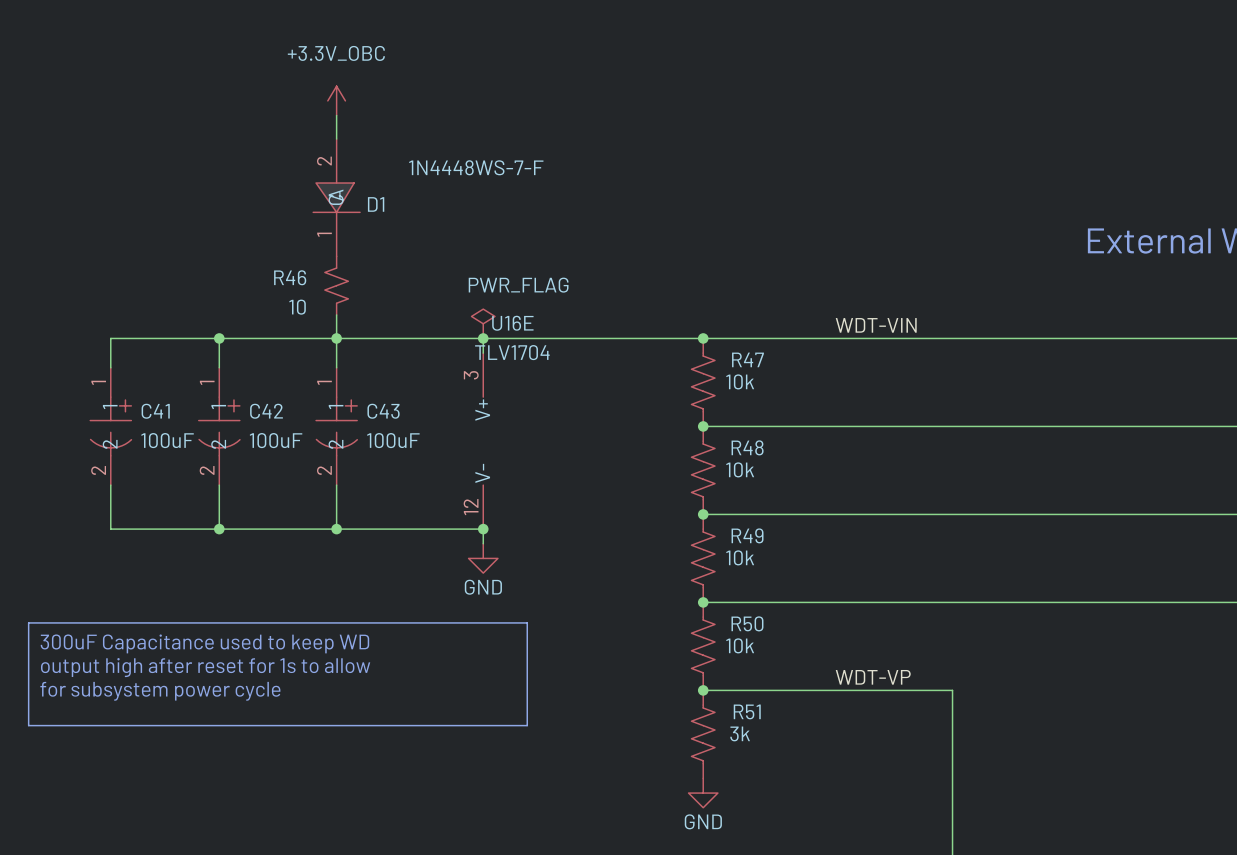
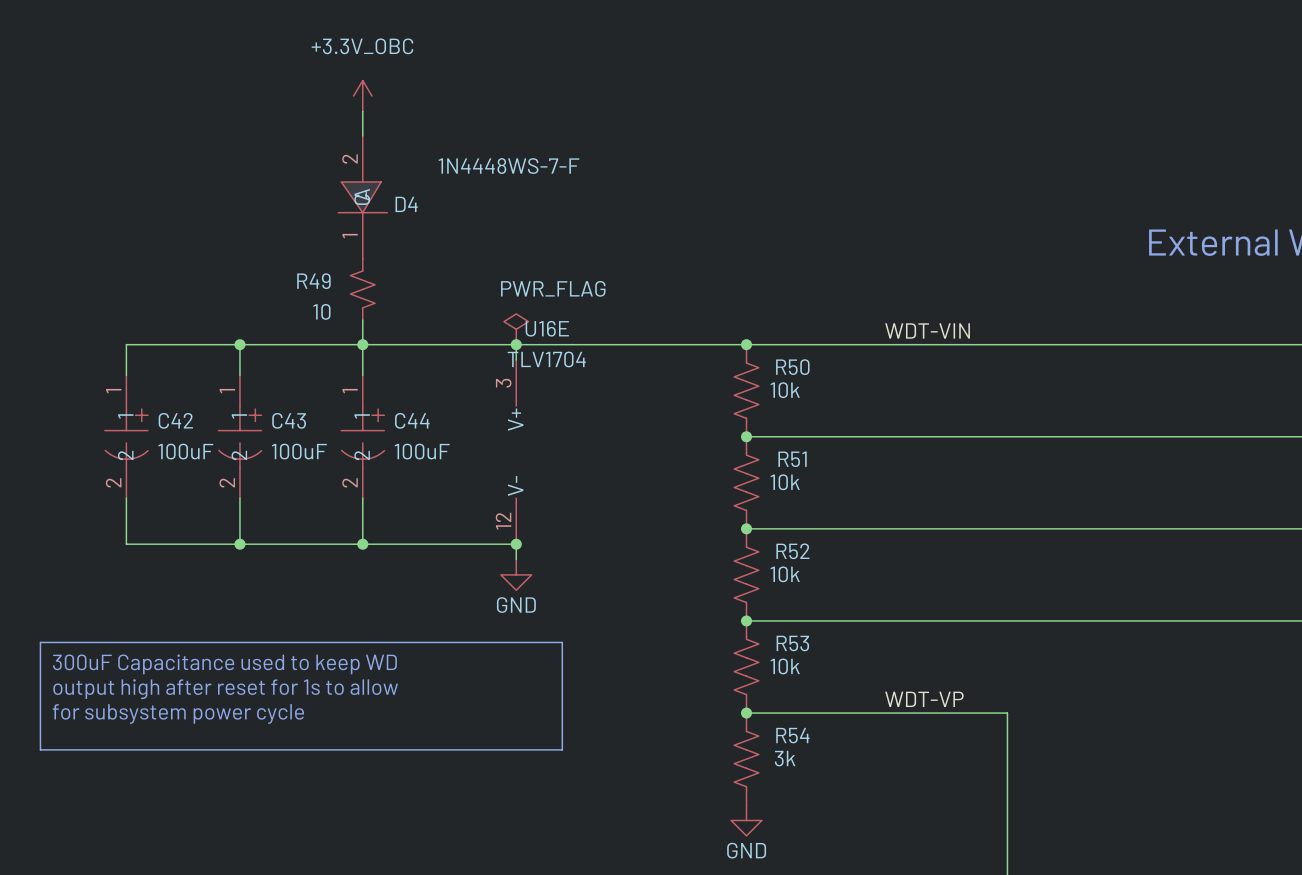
D1 name: D1 (376, 204) -> D4 (406, 204)
R46 name: R46 (290, 277) -> R49 (313, 281)
R47 name: R47 (747, 359) -> R50 (792, 367)
C41 name: C41 (155, 411) -> C42 (175, 420)
C42 name: C42 (266, 411) -> C43 (289, 420)
C43 name: C43 (383, 411) -> C44 (412, 420)
R48 name: R48 (747, 447) -> R51 (792, 459)
R49 name: R49 (747, 535) -> R52 (792, 551)
R50 name: R50 (747, 623) -> R53 (792, 643)
R51 name: R51 (747, 711) -> R54 (792, 735)

